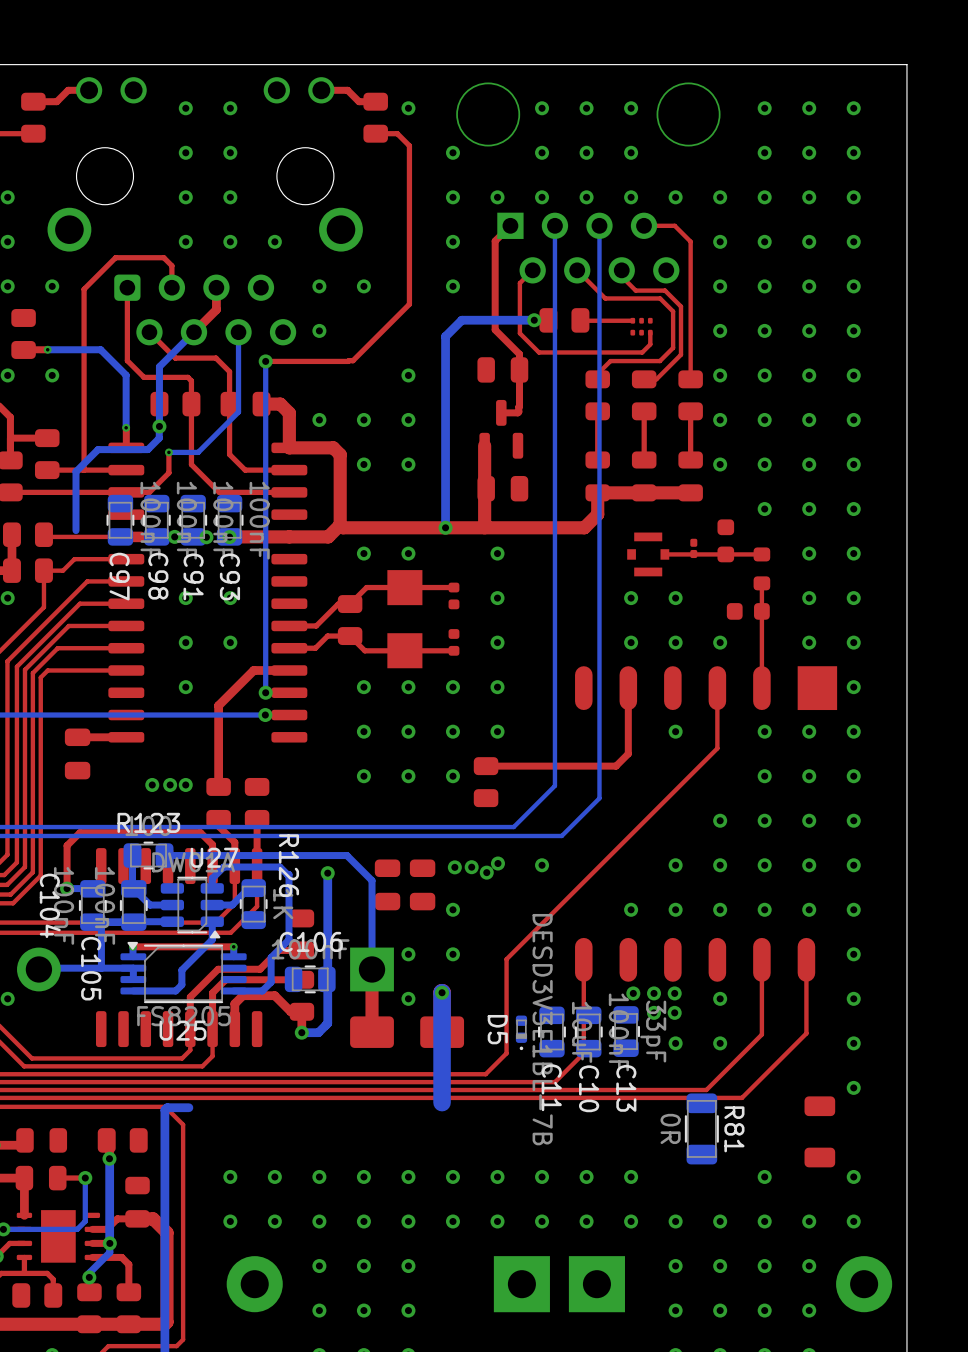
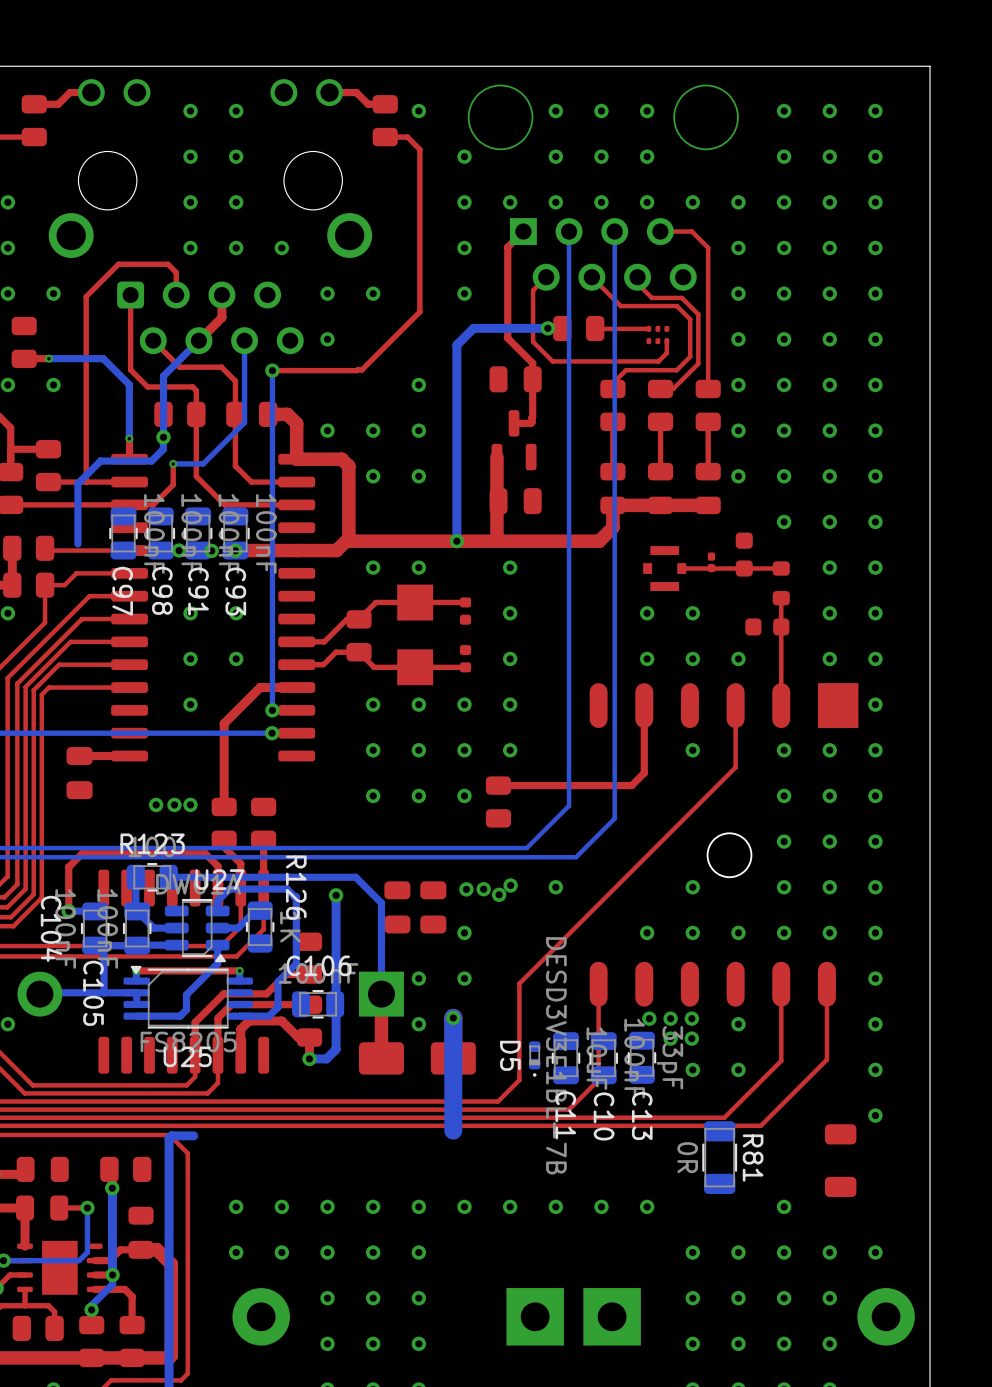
round board edge: none -> [706, 832, 753, 879]
via: (720, 820) -> none
via: (720, 865) -> none
via: (853, 1176) -> none
via: (452, 1221) -> none
via: (497, 1221) -> none
via: (542, 1221) -> none
via: (586, 1221) -> none
via: (631, 1221) -> none

